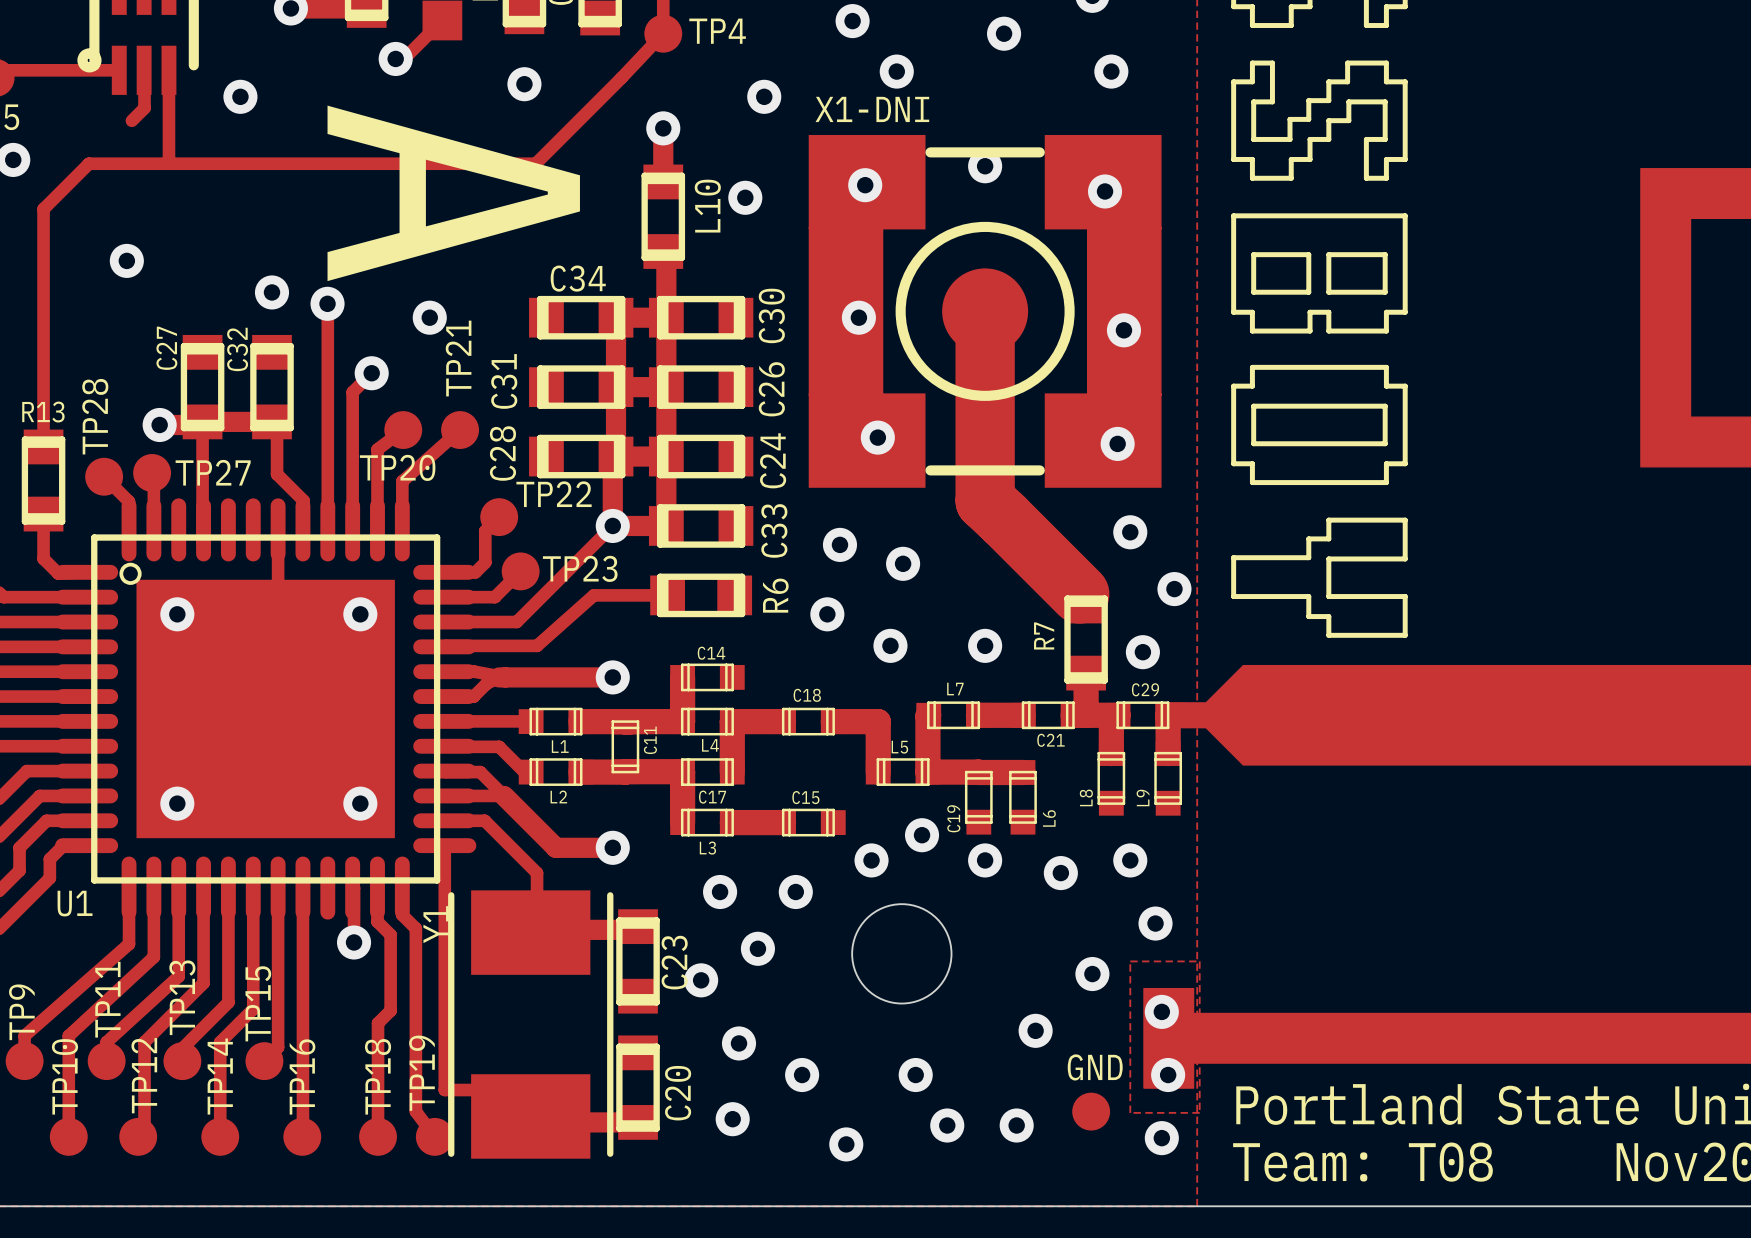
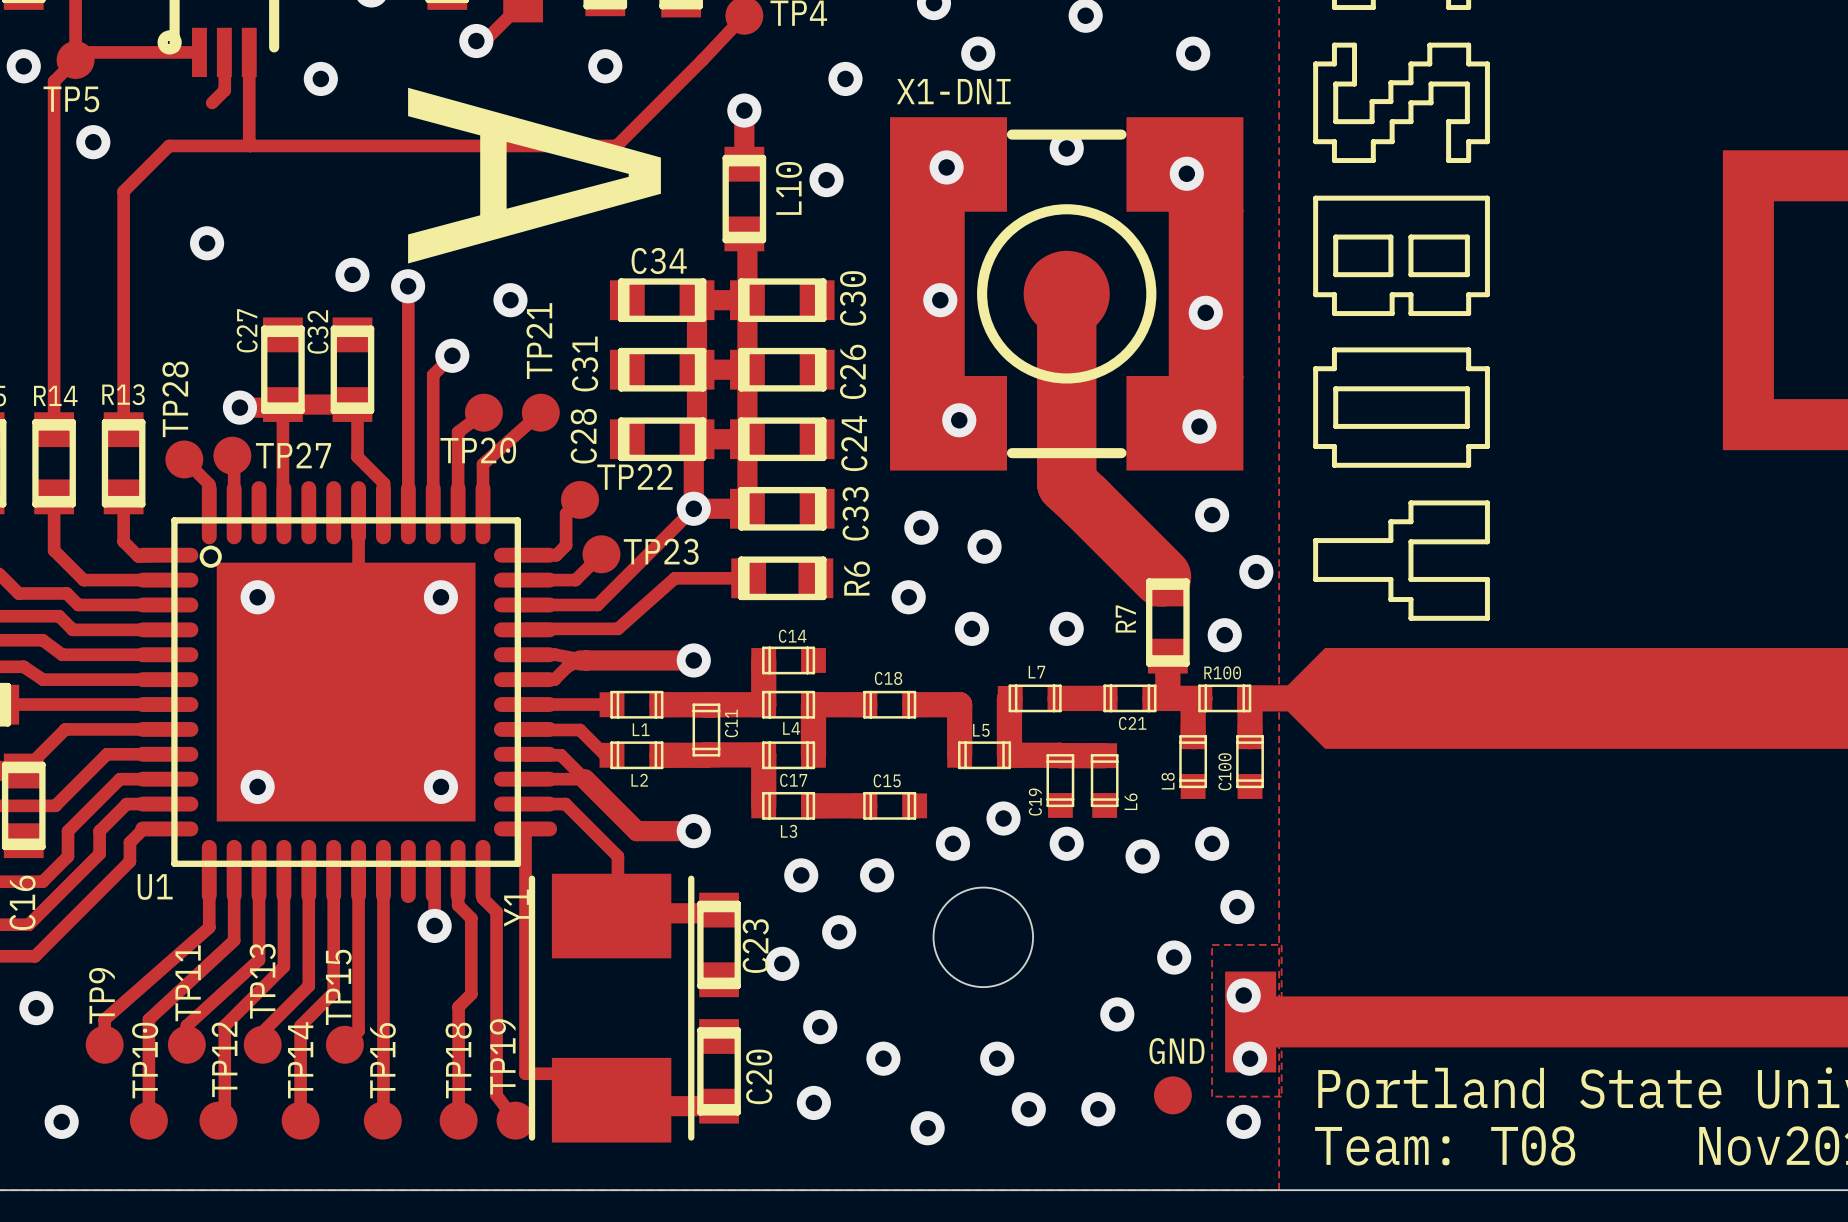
C29 name: C29 (1145, 689) -> R100 (1222, 672)
L9 name: L9 (1143, 797) -> C100 (1224, 771)

